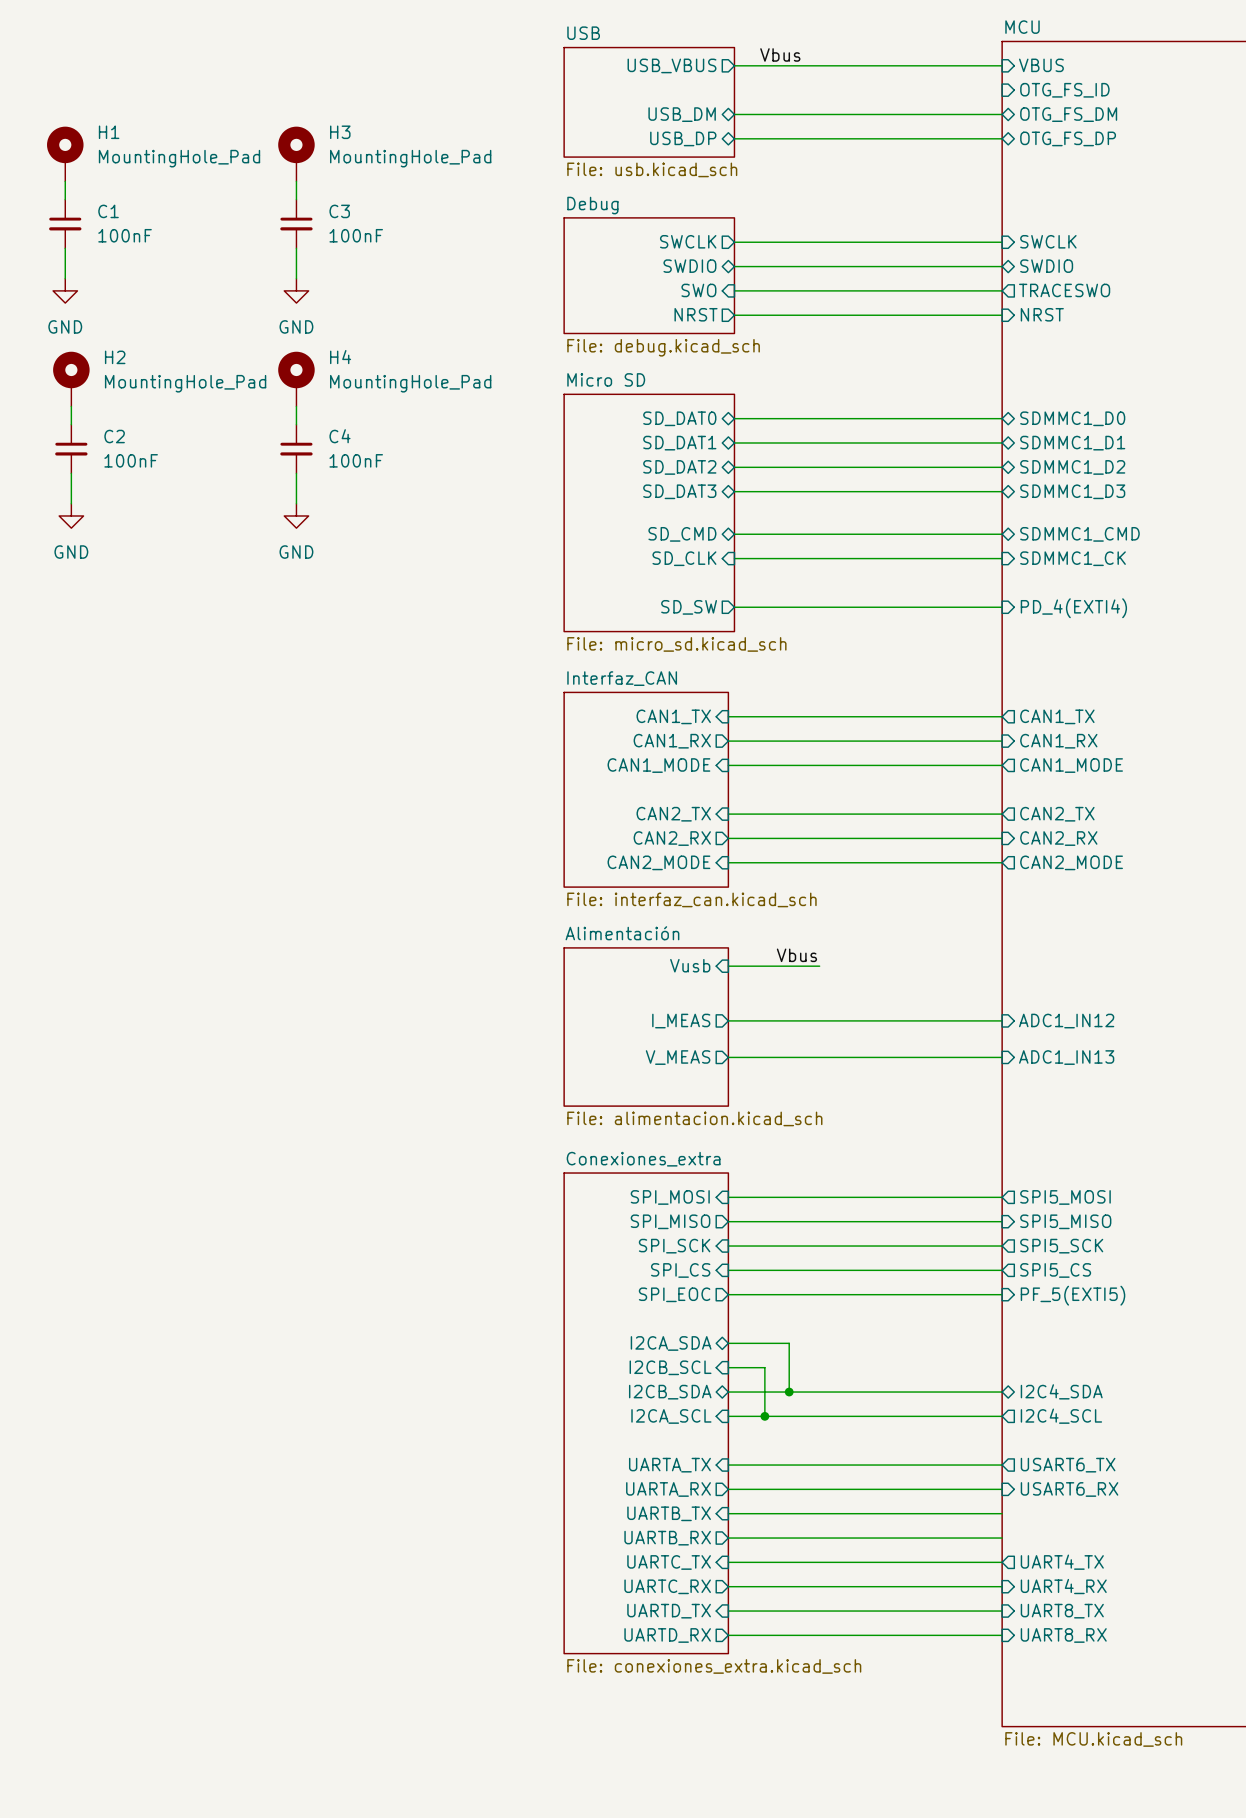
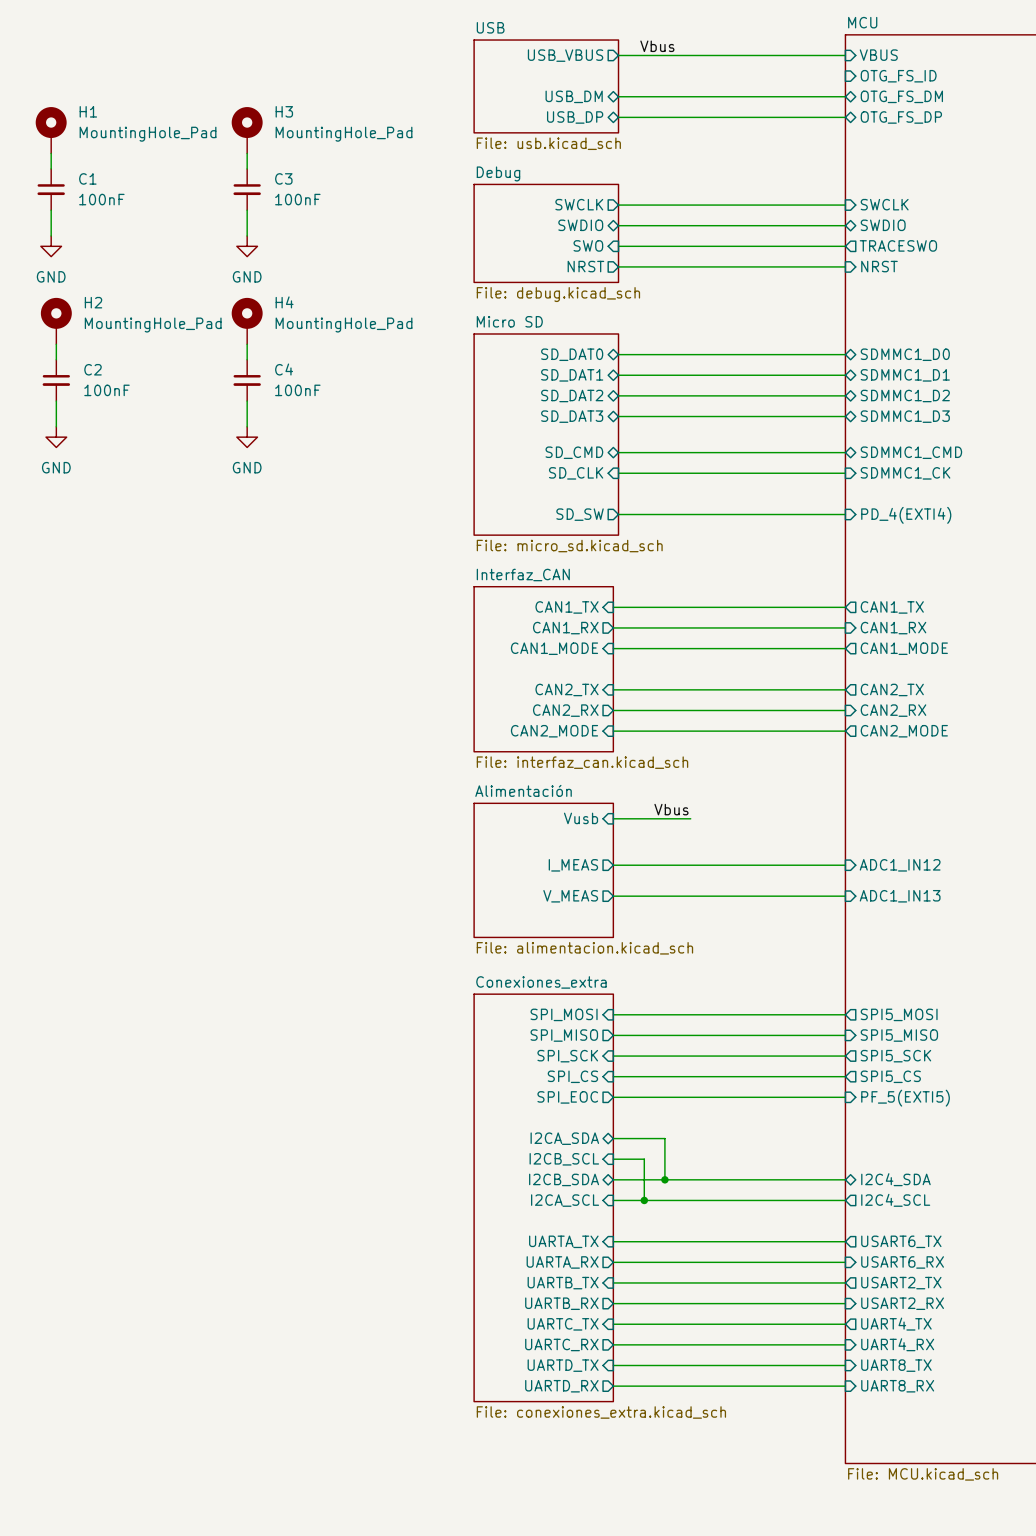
sheet pin: none -> USART2_TX (901, 1283)
sheet pin: none -> USART2_RX (902, 1303)

